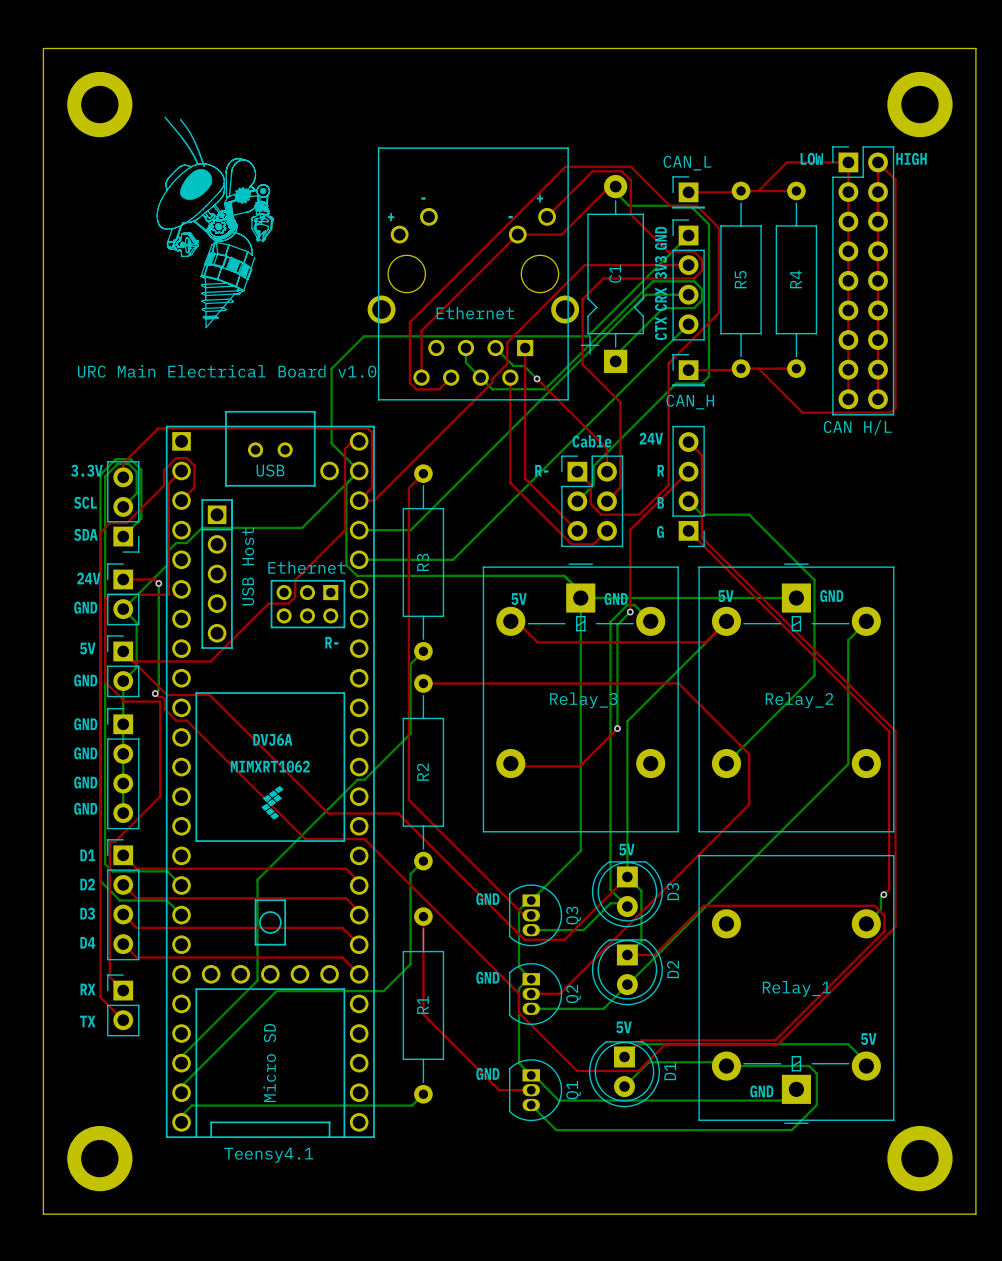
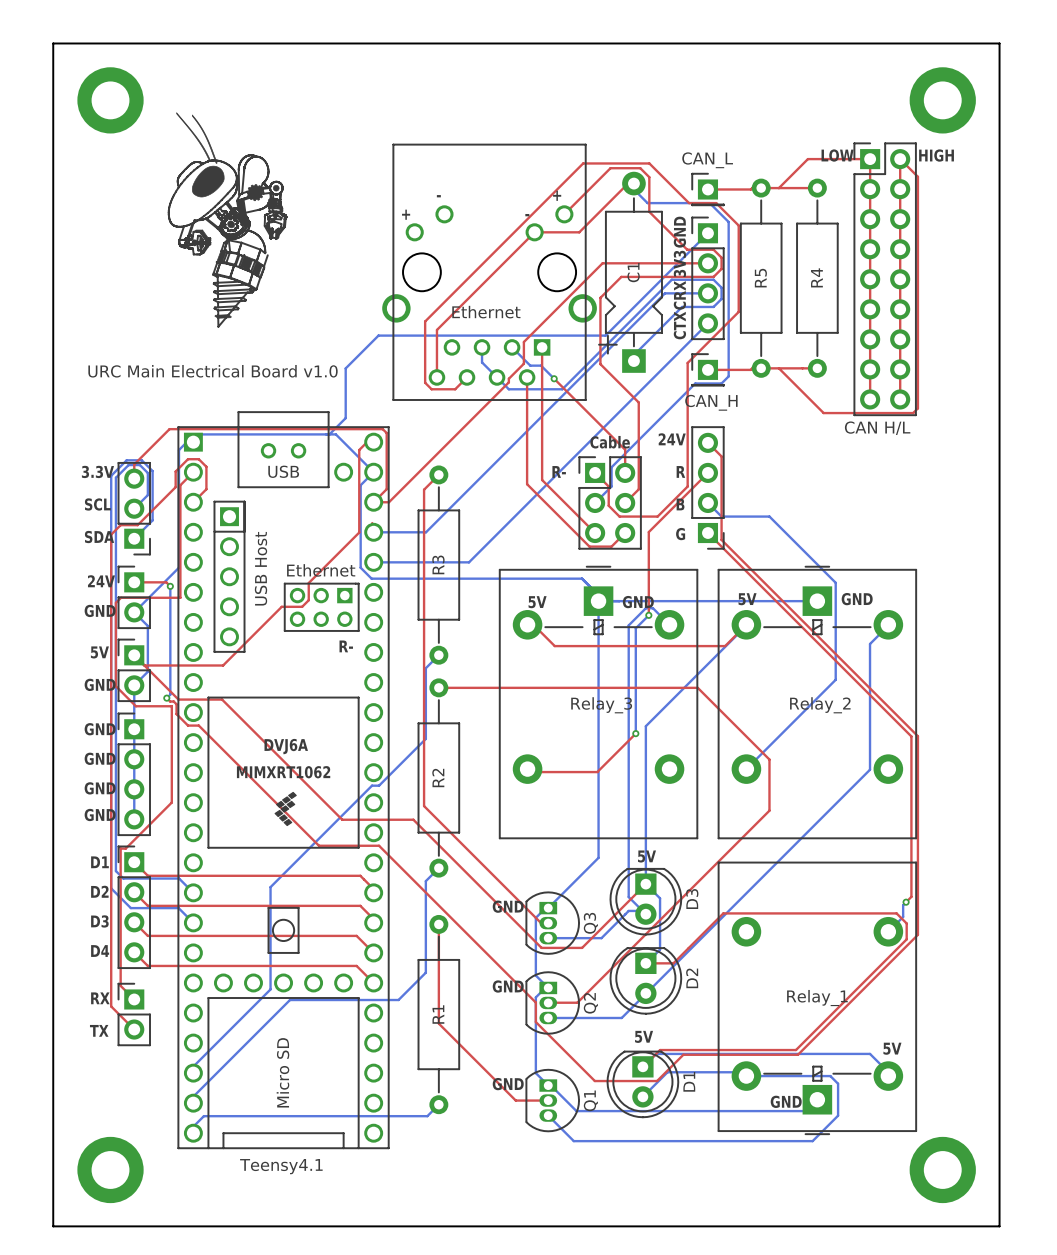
bottom track: (331, 417) (331, 443) -> (345, 418) (329, 434)
bottom track: (346, 483) (302, 527) (201, 527) (186, 543) (176, 543) (167, 551) -> (345, 444) (335, 434) (194, 434) (178, 450) (178, 554)

